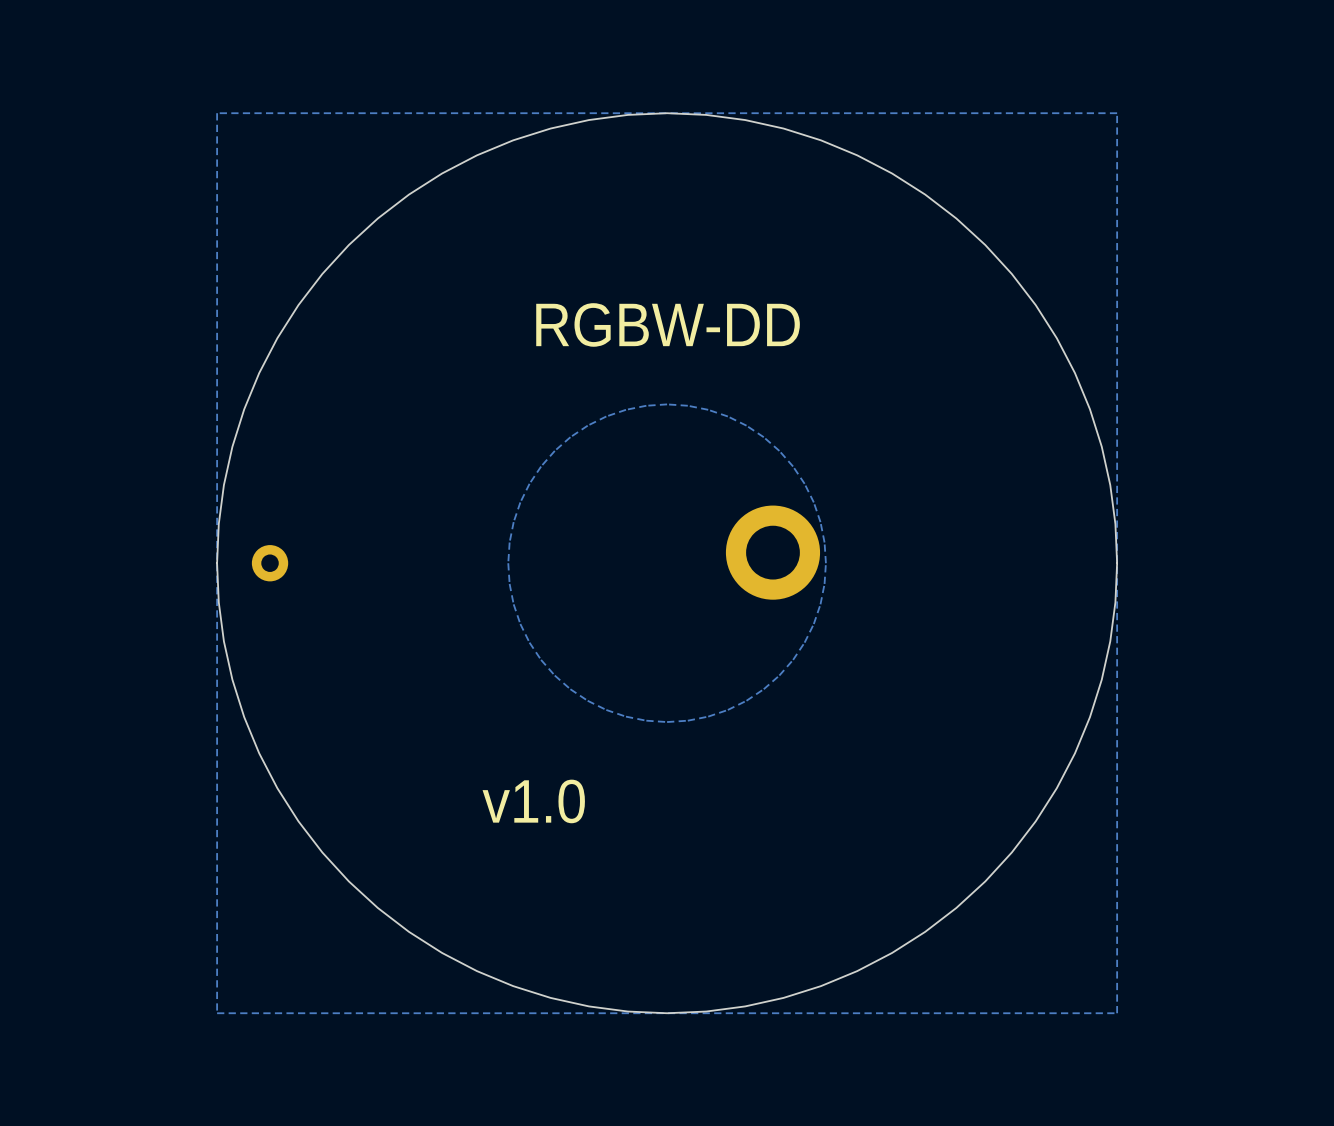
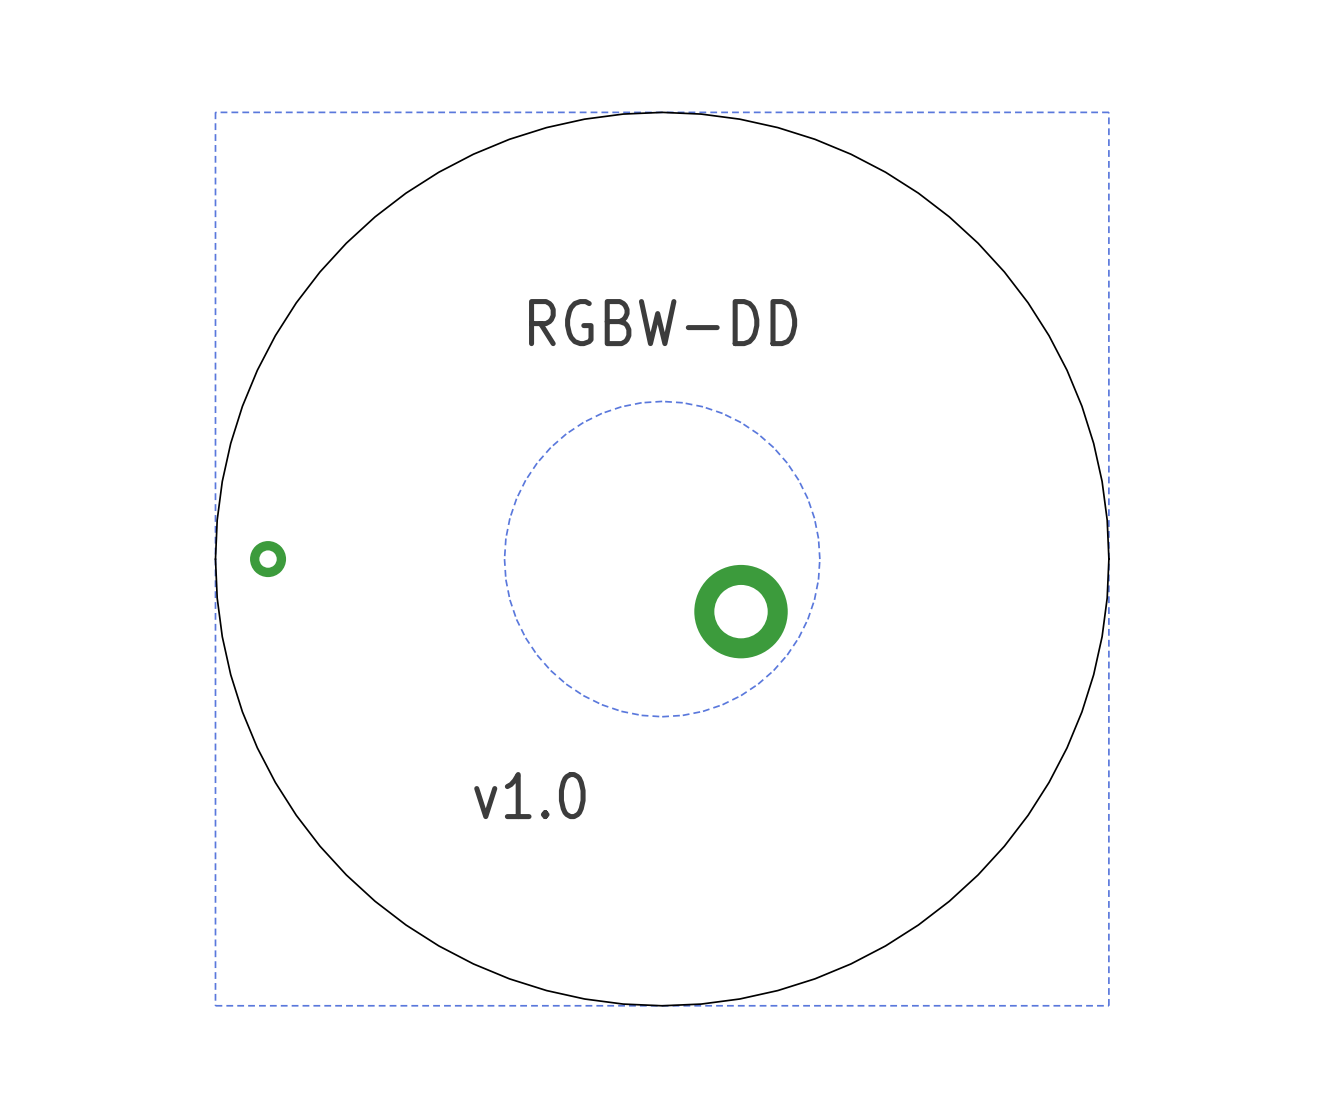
part position: (772, 552) -> (741, 611)

